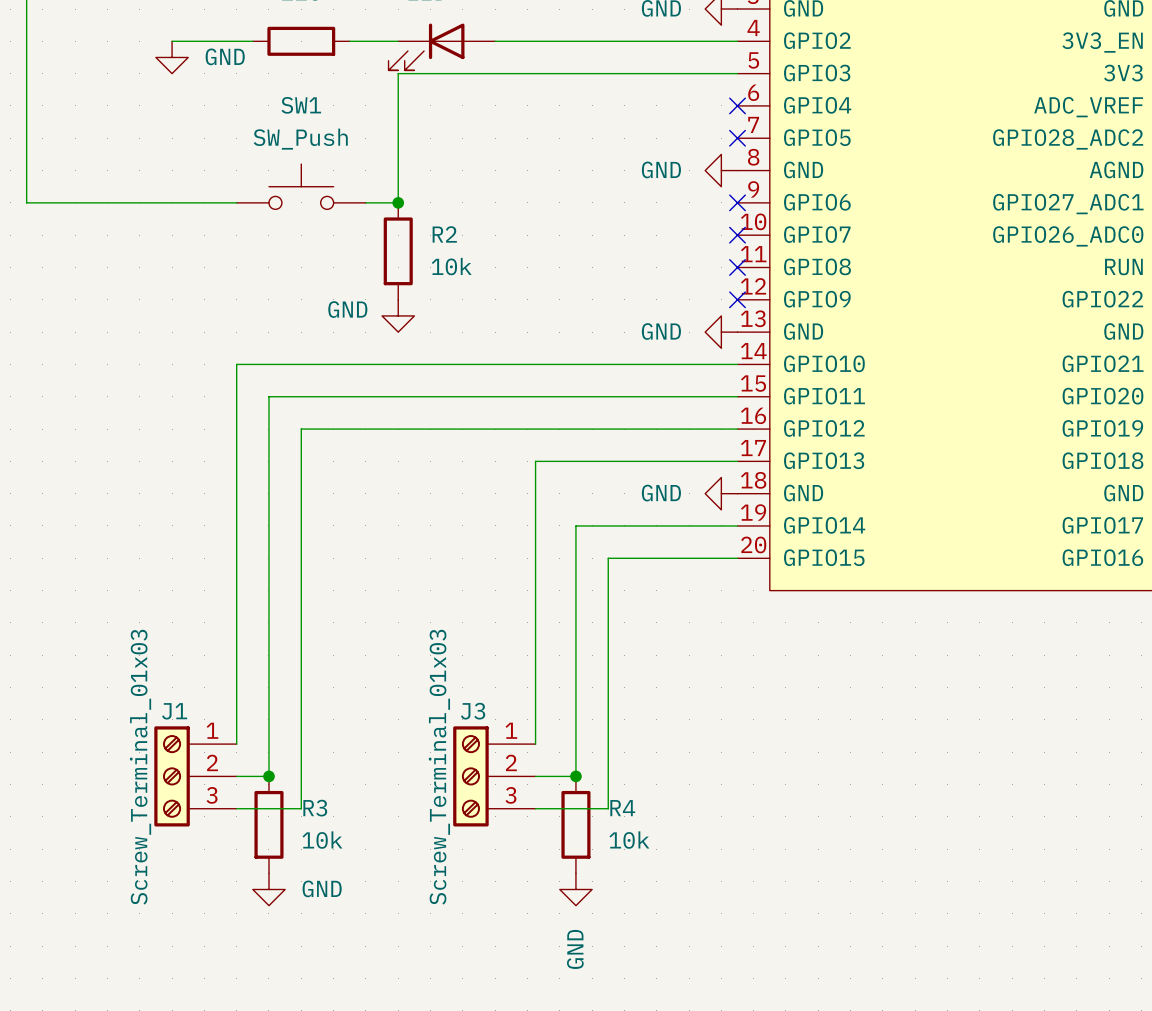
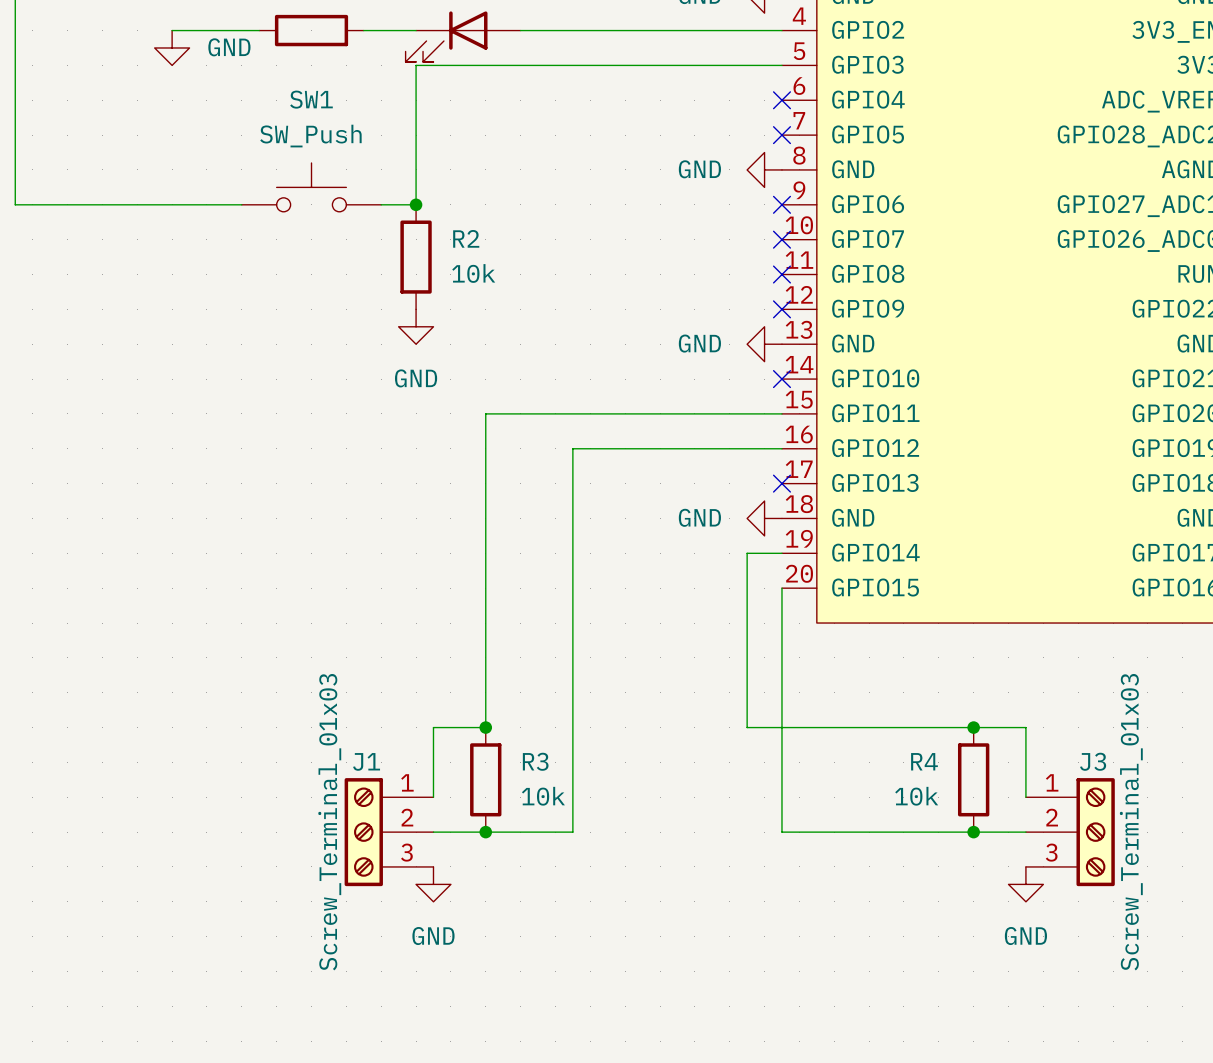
power symbol text position: GND (347, 309) -> GND (416, 378)
wire: (737, 364) (236, 364) (236, 744) -> none
no-connect mark: none -> (781, 379)
wire: (462, 396) (268, 396) (268, 776) (236, 776) -> (485, 413) (485, 727) (433, 727) (433, 797)
wire: (543, 429) (301, 429) (301, 808) (236, 808) -> (572, 448) (572, 832) (433, 832)
wire: (737, 461) (535, 461) (535, 744) -> none
no-connect mark: none -> (781, 483)
wire: (705, 525) (575, 525) (575, 776) (535, 776) -> (747, 553) (747, 727) (1025, 727) (1025, 797)
wire: (737, 558) (608, 558) (608, 808) (535, 808) -> (781, 588) (781, 832) (1025, 832)
junction: none -> (485, 727)
junction: none -> (973, 727)
J1 position: (195, 776) -> (389, 832)
junction: (268, 776) -> none
J3 flip: as is (470, 776) -> left-right (1095, 832)
J3 position: (494, 776) -> (1070, 832)
junction: (575, 776) -> none
junction: none -> (485, 832)
junction: none -> (973, 832)
R4 name position: R4 (622, 808) -> R4 (924, 761)
R3 position: (268, 824) -> (485, 779)
R4 position: (575, 824) -> (973, 779)
power symbol: none -> GND (433, 884)
power symbol: none -> GND (1025, 884)
R4 value position: 10k (629, 840) -> 10k (916, 796)
power symbol: GND (268, 889) -> none
power symbol: GND (575, 889) -> none

